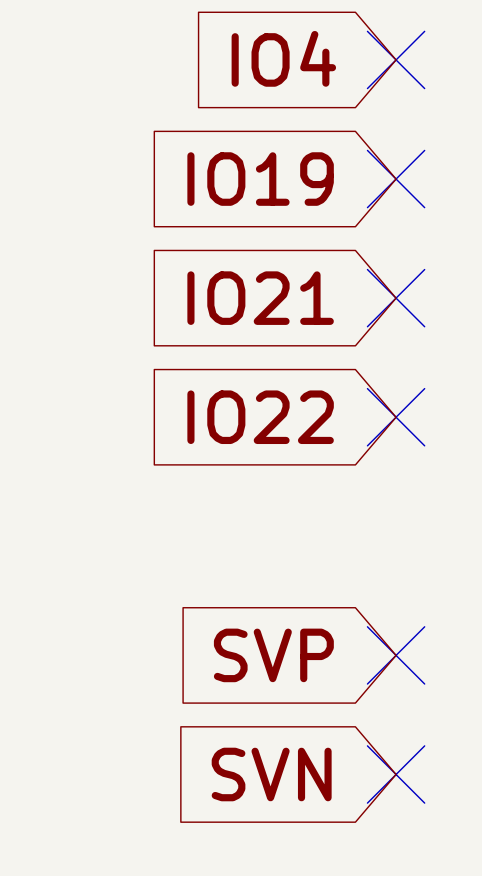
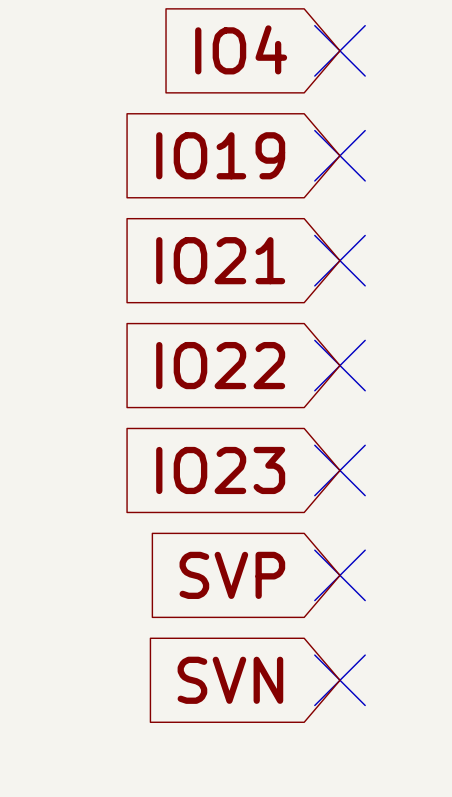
global label: none -> IO23 (220, 470)
no-connect mark: none -> (340, 470)

